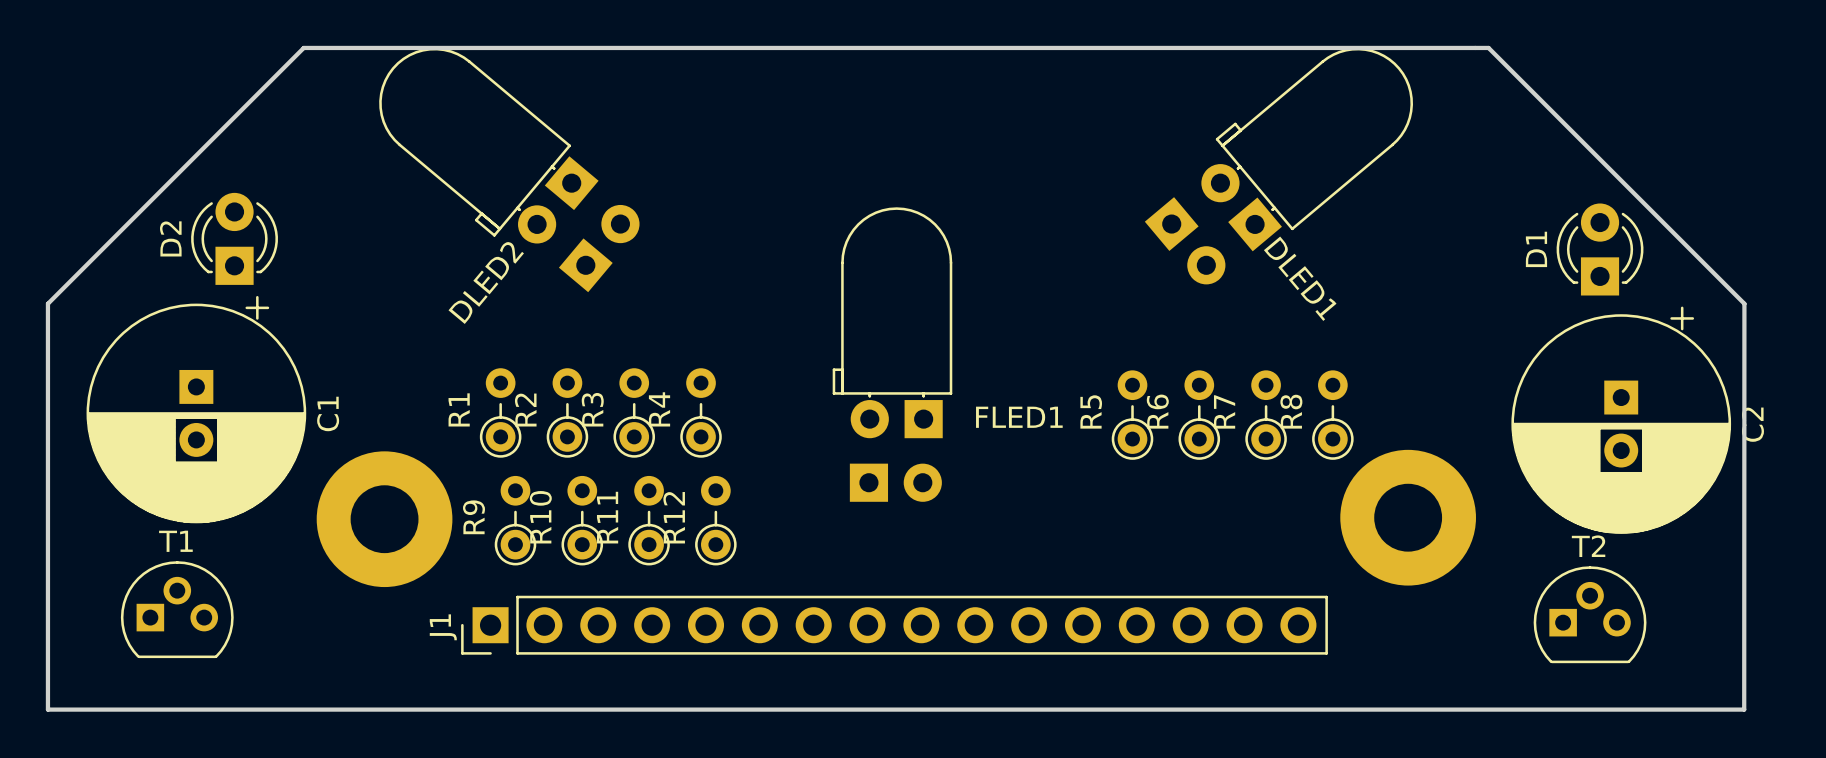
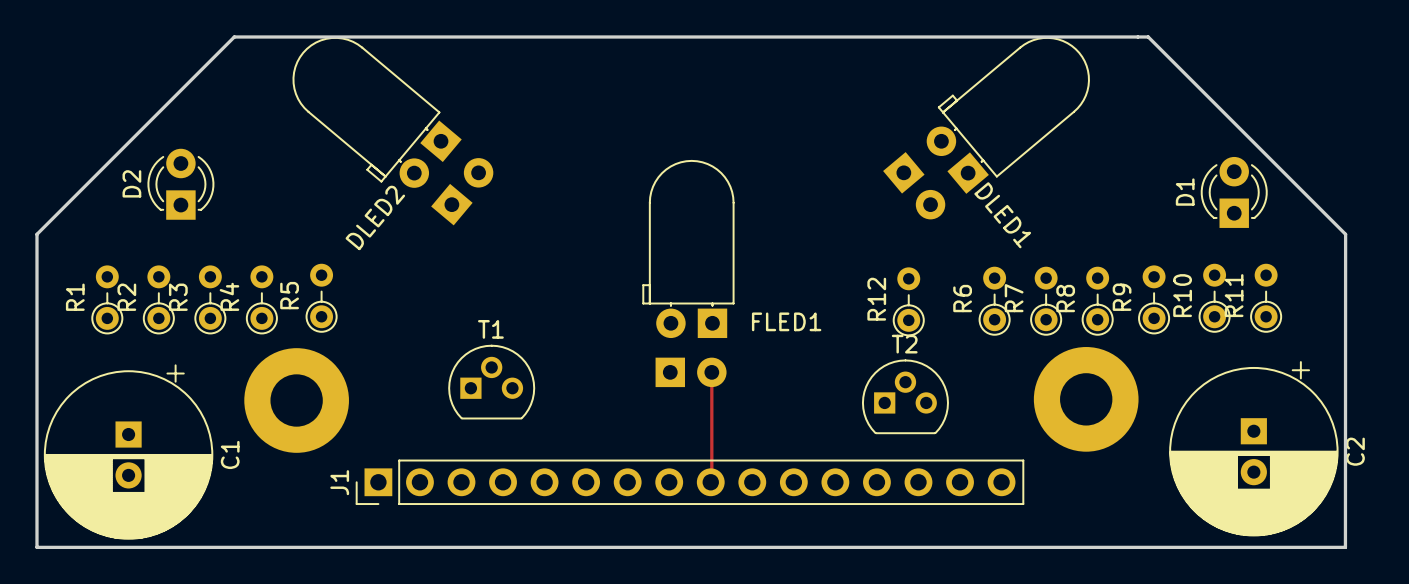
C1 position: (196, 409) -> (128, 452)
R1 position: (500, 412) -> (107, 299)
R2 position: (567, 412) -> (158, 299)
R3 position: (634, 412) -> (210, 299)
R4 position: (701, 412) -> (261, 299)
R5 position: (1132, 415) -> (321, 298)
R6 position: (1199, 415) -> (994, 301)
R7 position: (1266, 415) -> (1046, 301)
R8 position: (1332, 415) -> (1097, 301)
C2 position: (1621, 420) -> (1253, 448)
track: none -> (711, 372) (710, 482)
R9 position: (515, 520) -> (1154, 299)
R10 position: (582, 520) -> (1214, 298)
R11 position: (649, 520) -> (1266, 298)
R12 position: (715, 520) -> (908, 301)
T1 position: (177, 609) -> (491, 382)
T2 position: (1590, 614) -> (905, 396)

